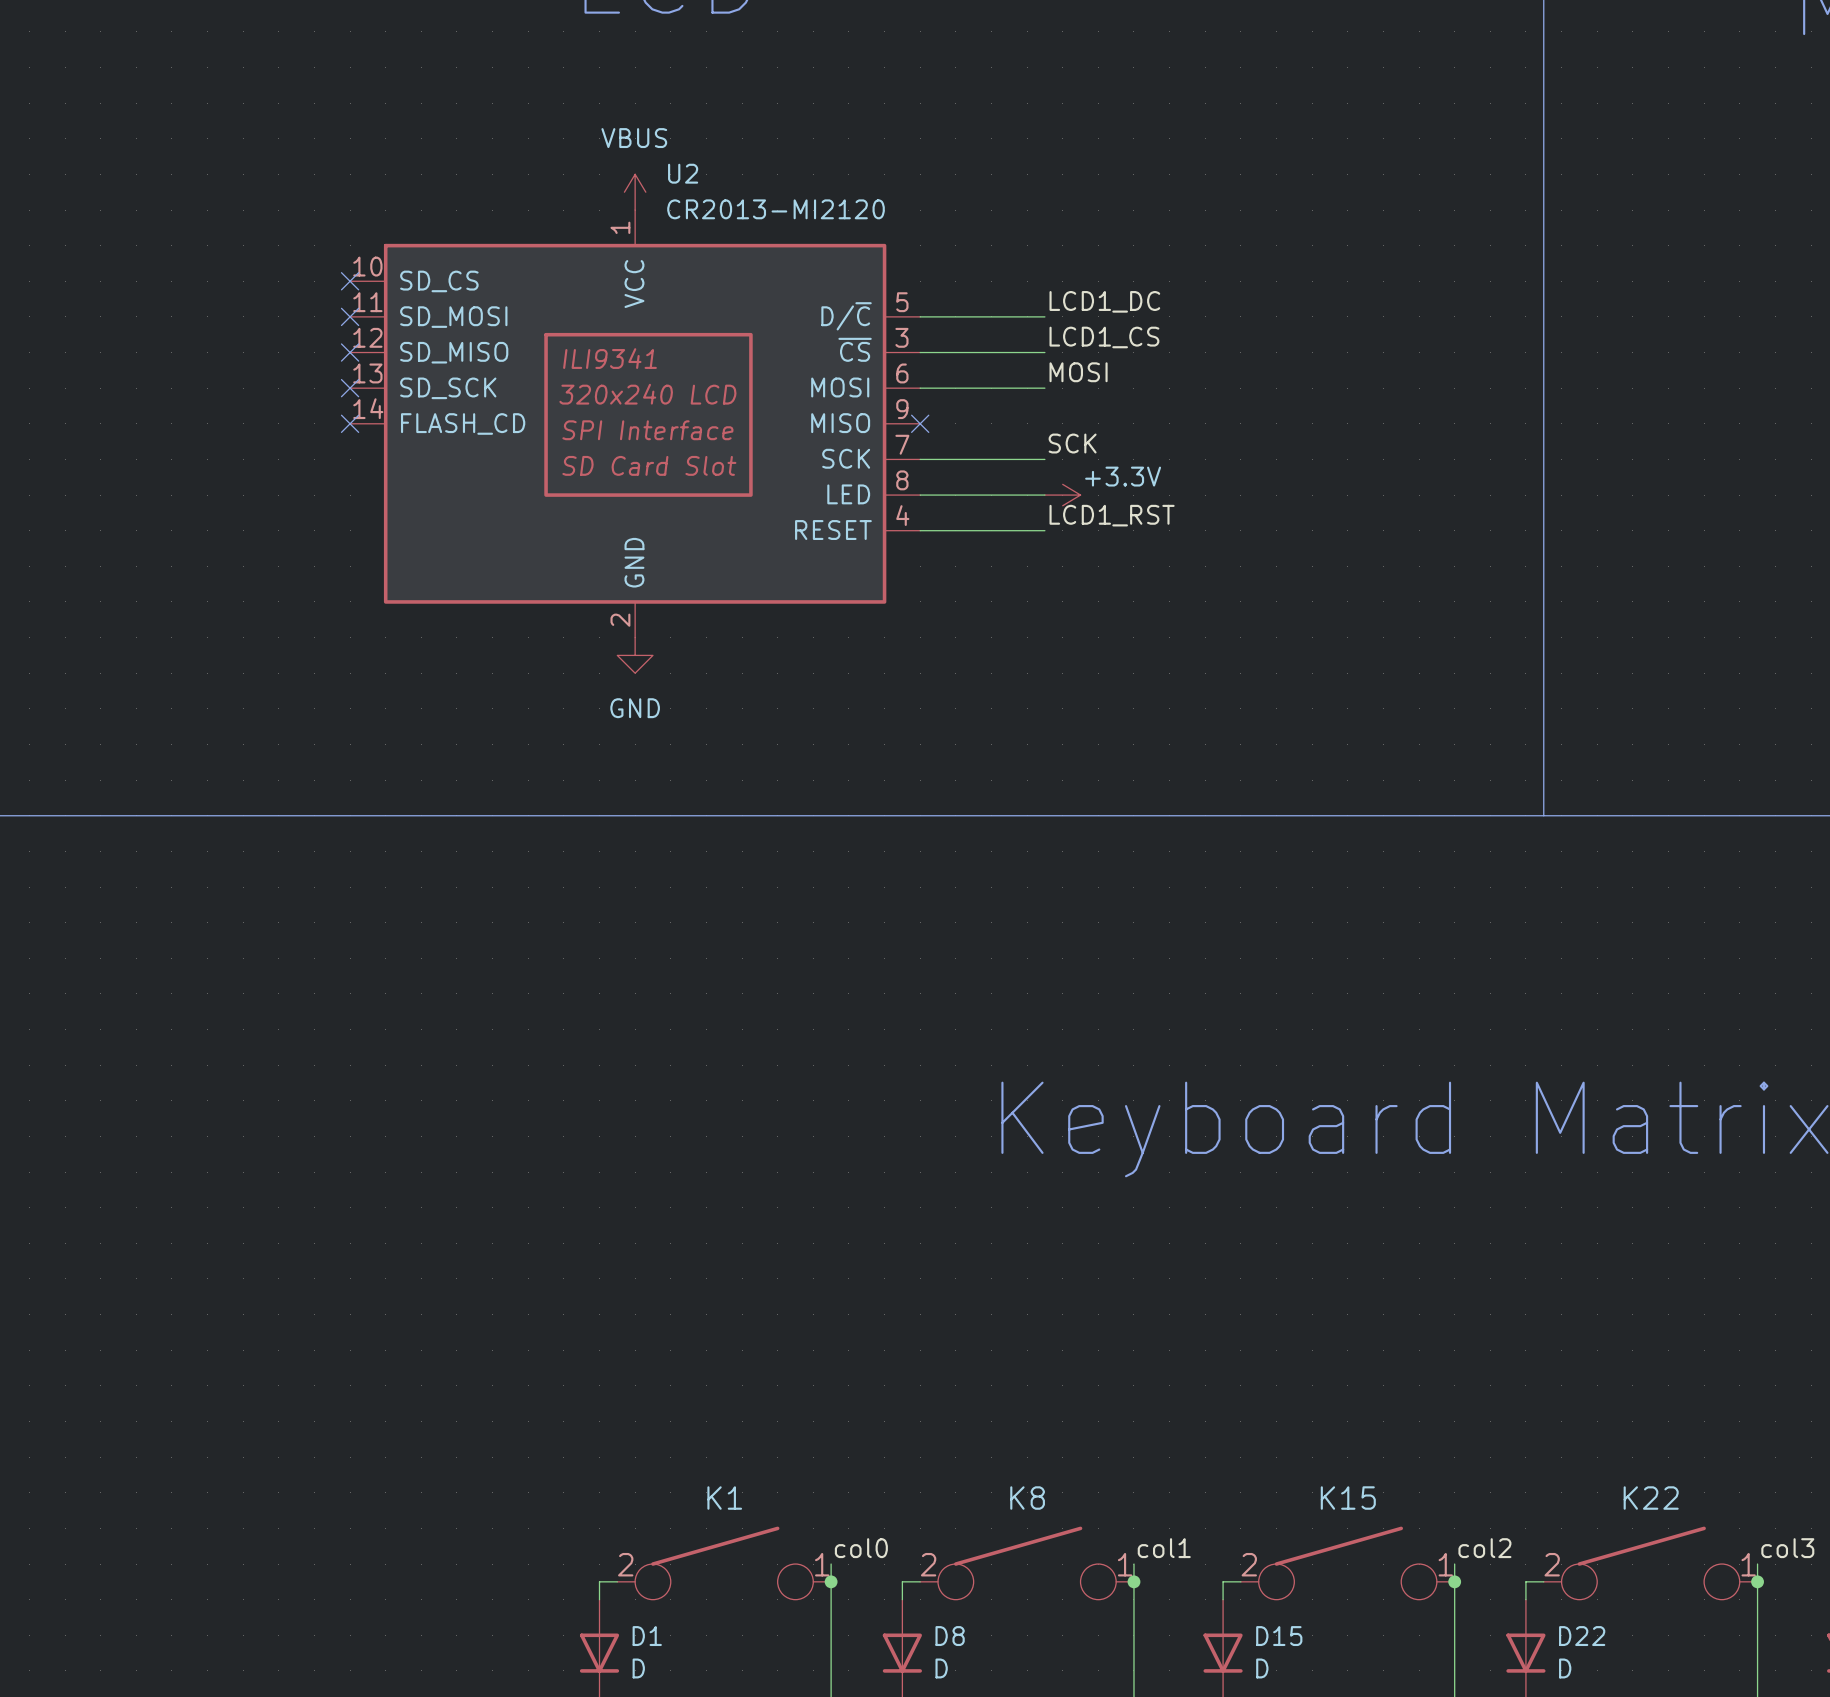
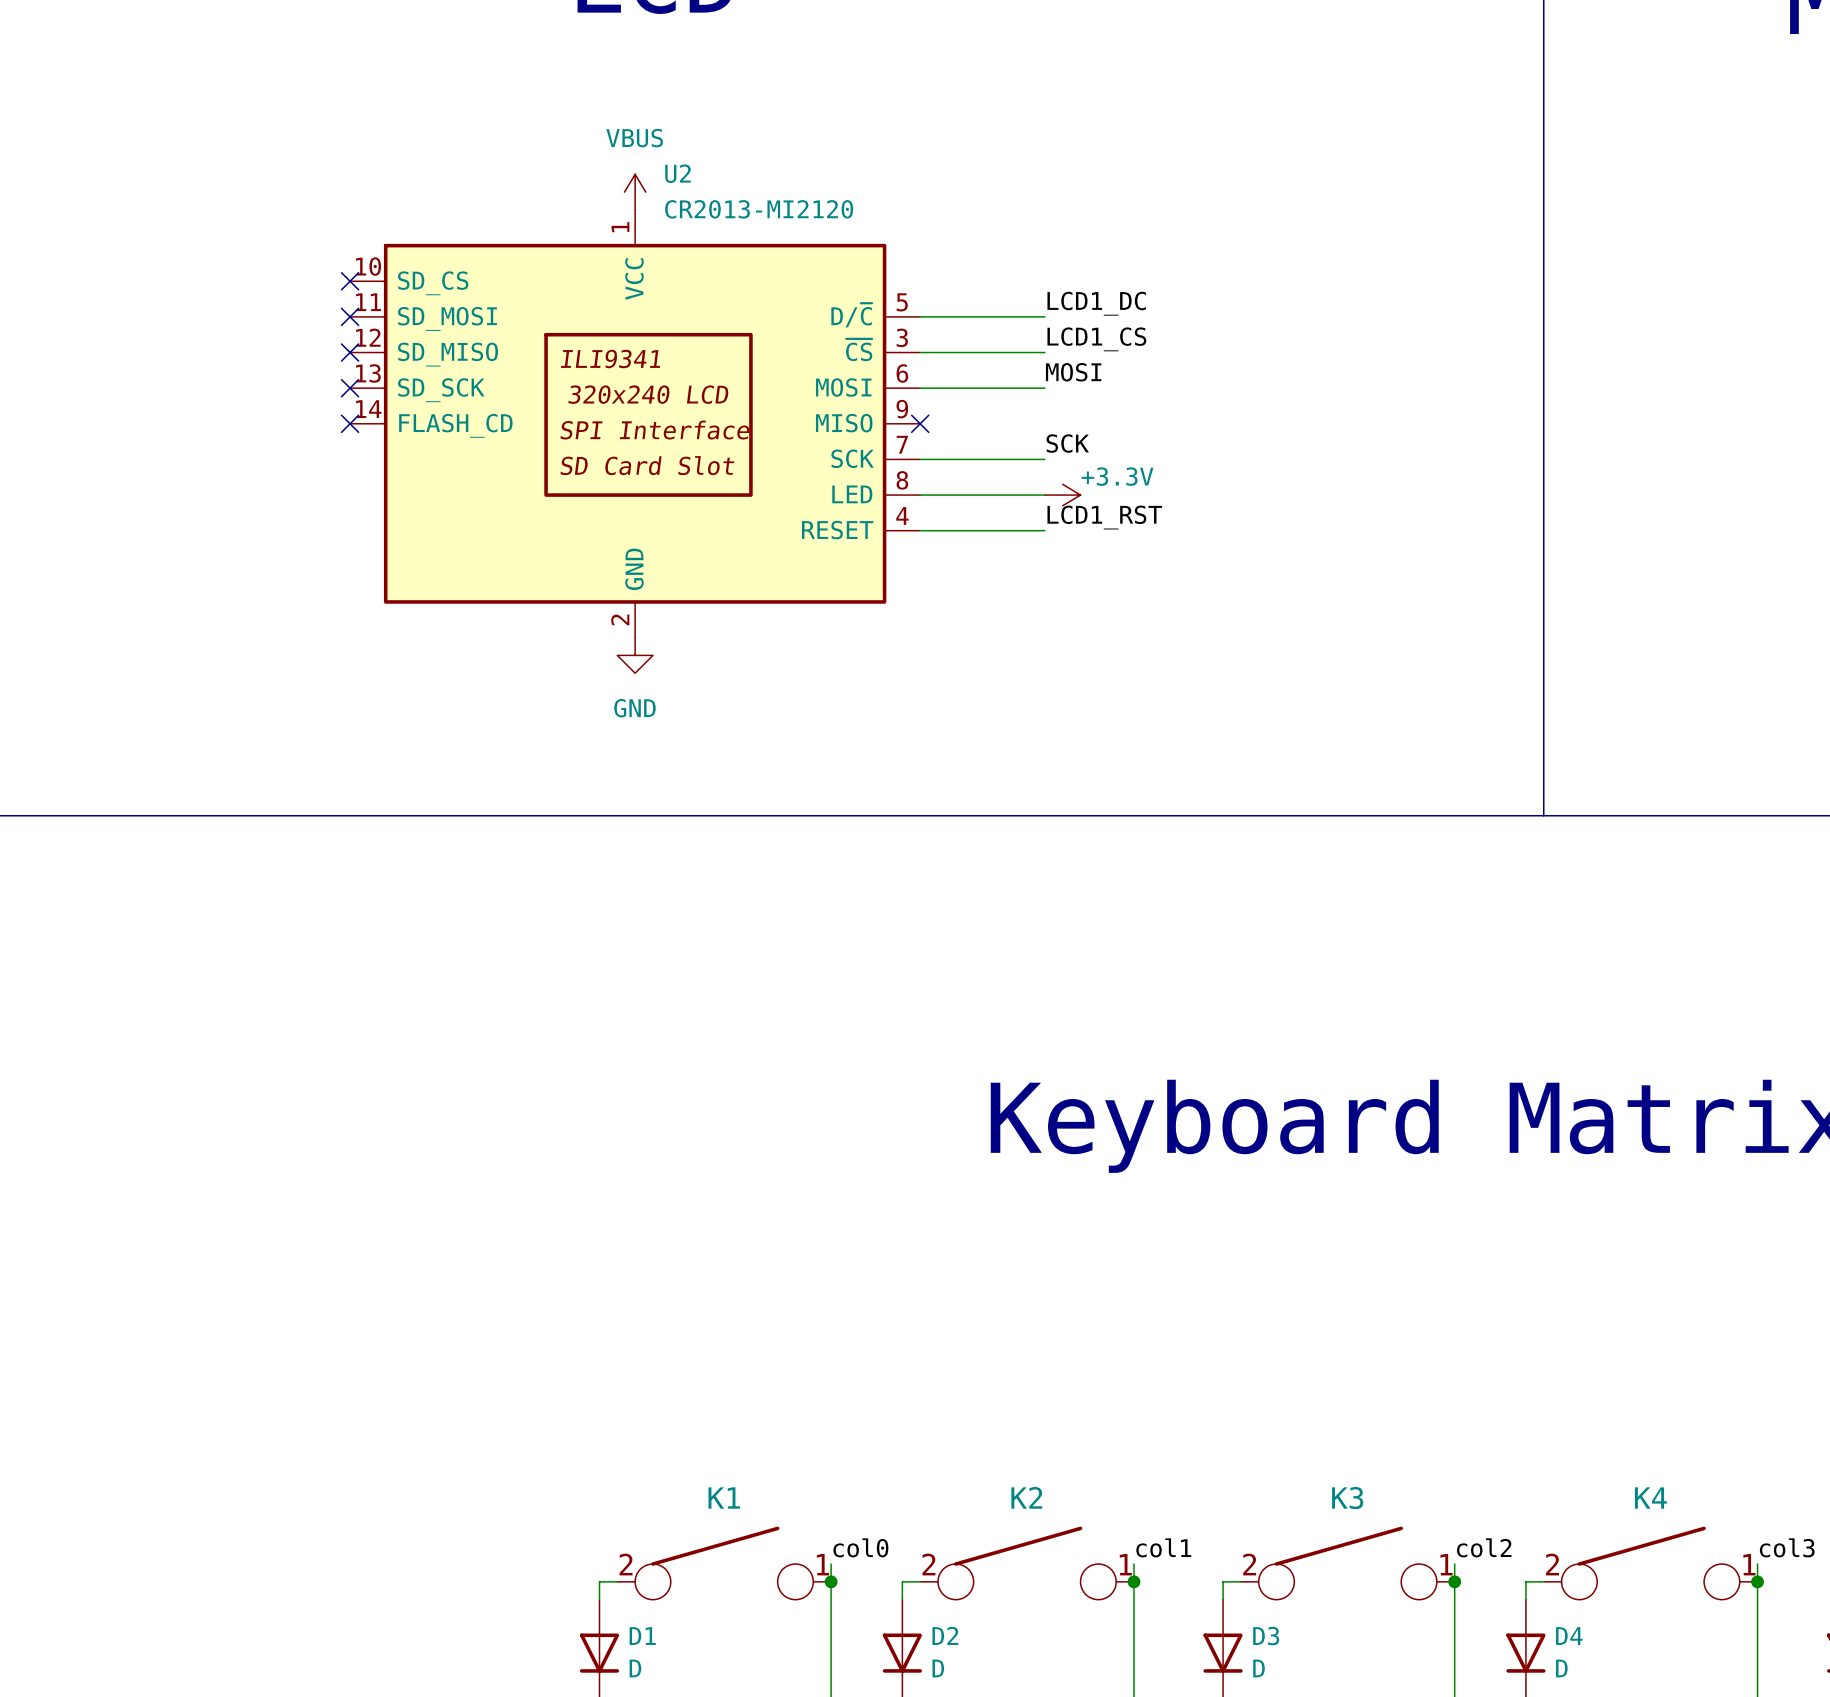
K8 name: K8 (1027, 1498) -> K2 (1026, 1497)
K15 name: K15 (1348, 1498) -> K3 (1347, 1498)
K22 name: K22 (1651, 1498) -> K4 (1650, 1498)
D8 name: D8 (950, 1636) -> D2 (945, 1635)
D15 name: D15 (1279, 1636) -> D3 (1266, 1636)
D22 name: D22 (1582, 1636) -> D4 (1569, 1636)

